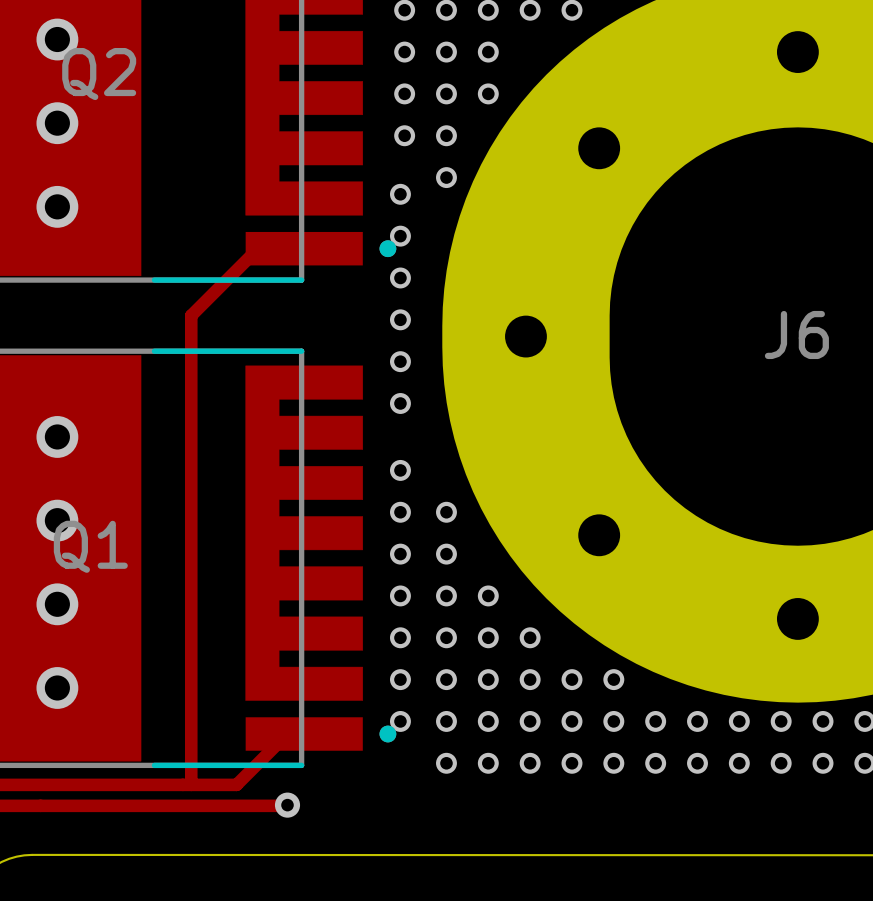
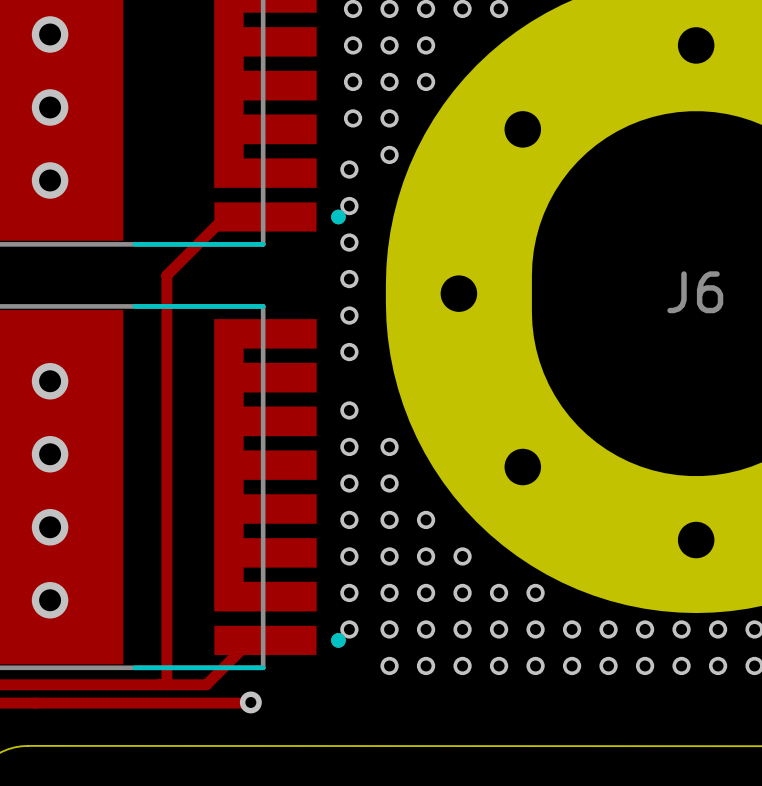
Q2 name: Q2 (99, 74) -> none
Q1 name: Q1 (90, 546) -> none

